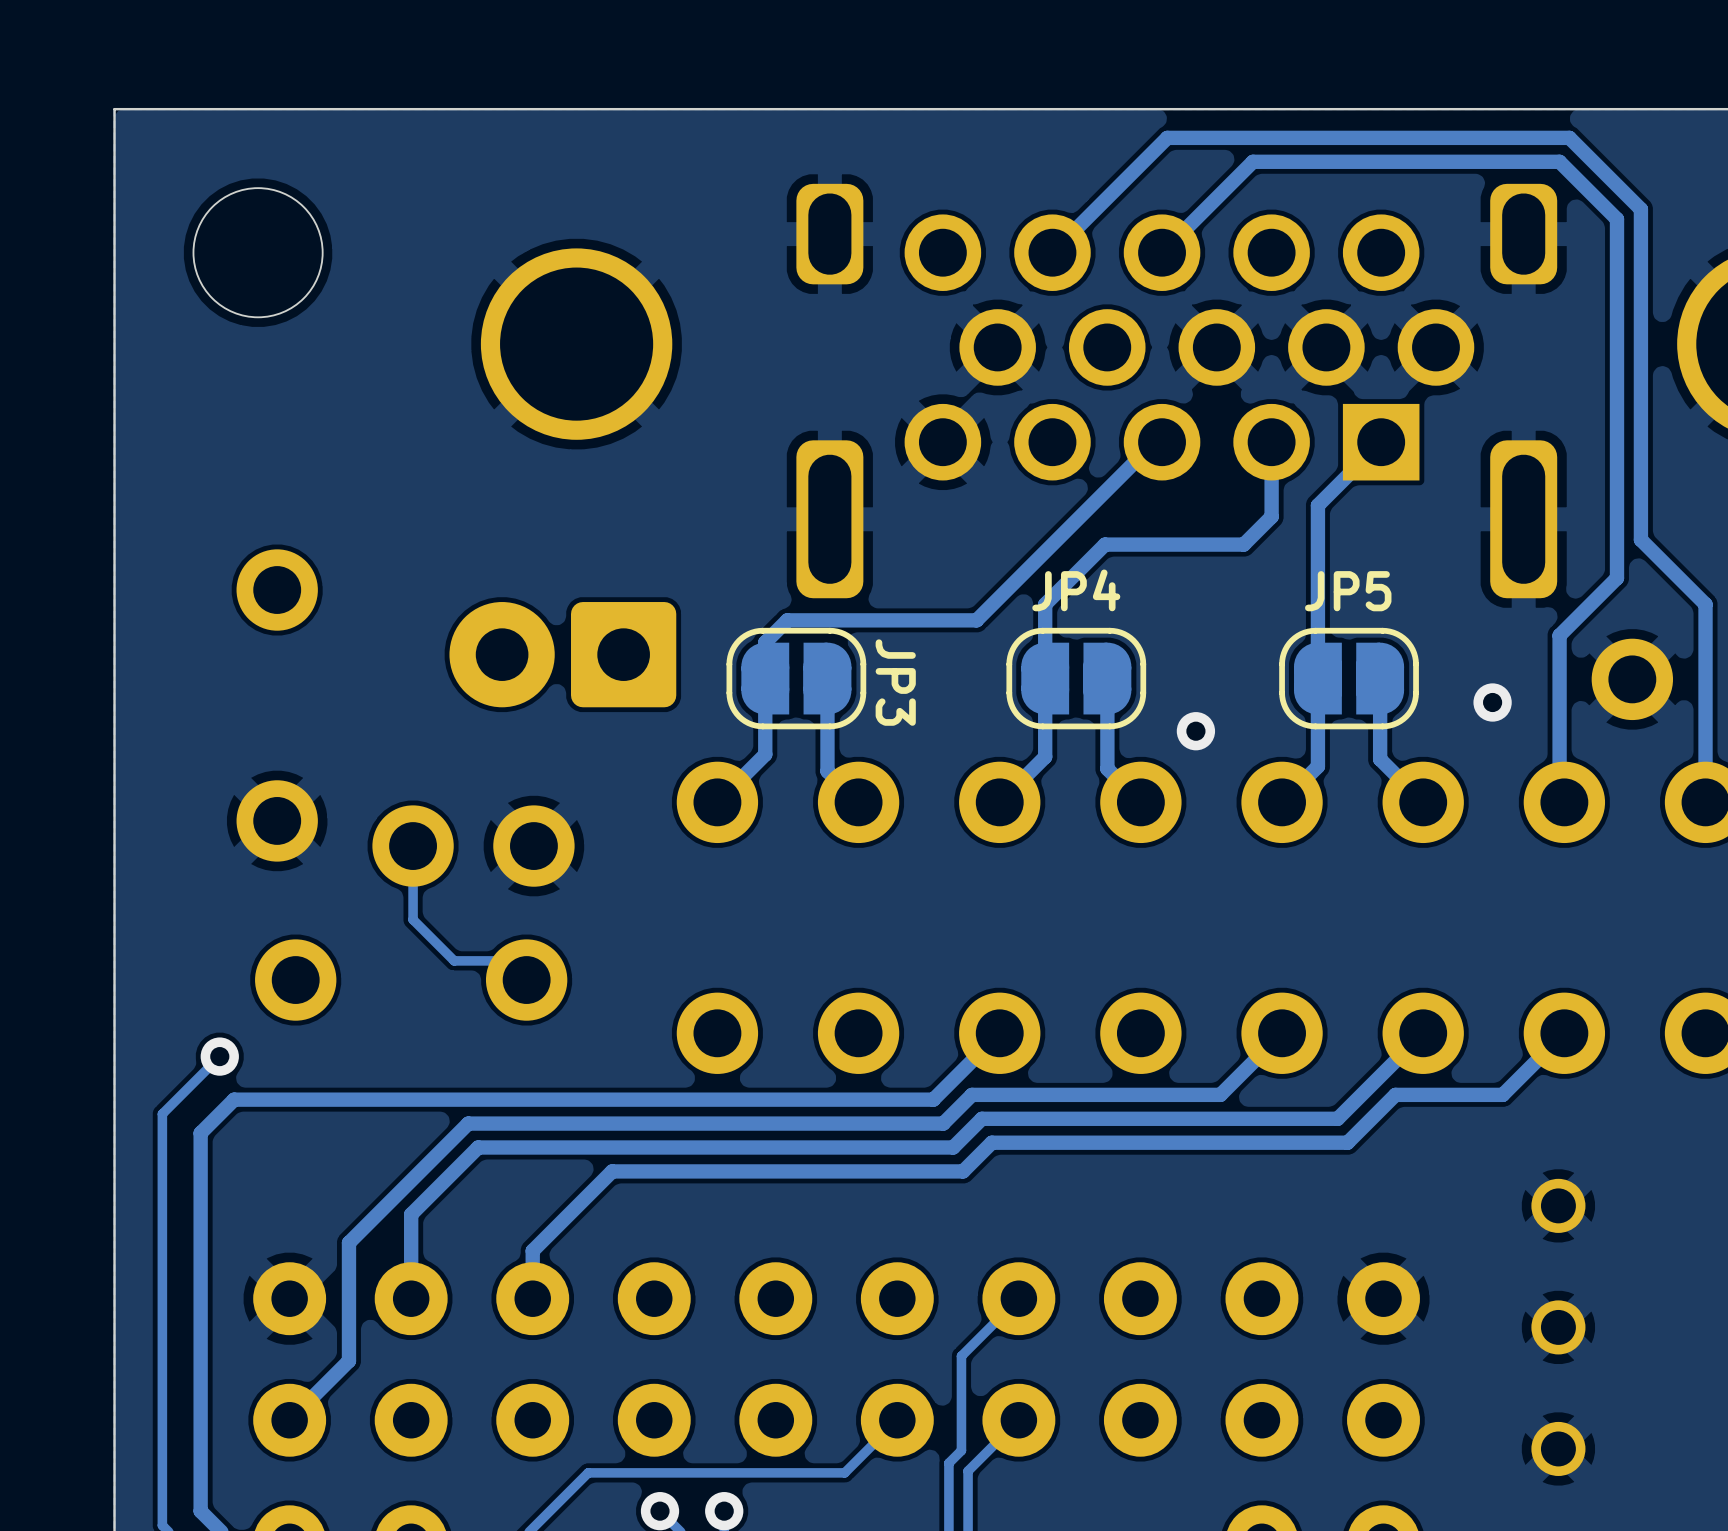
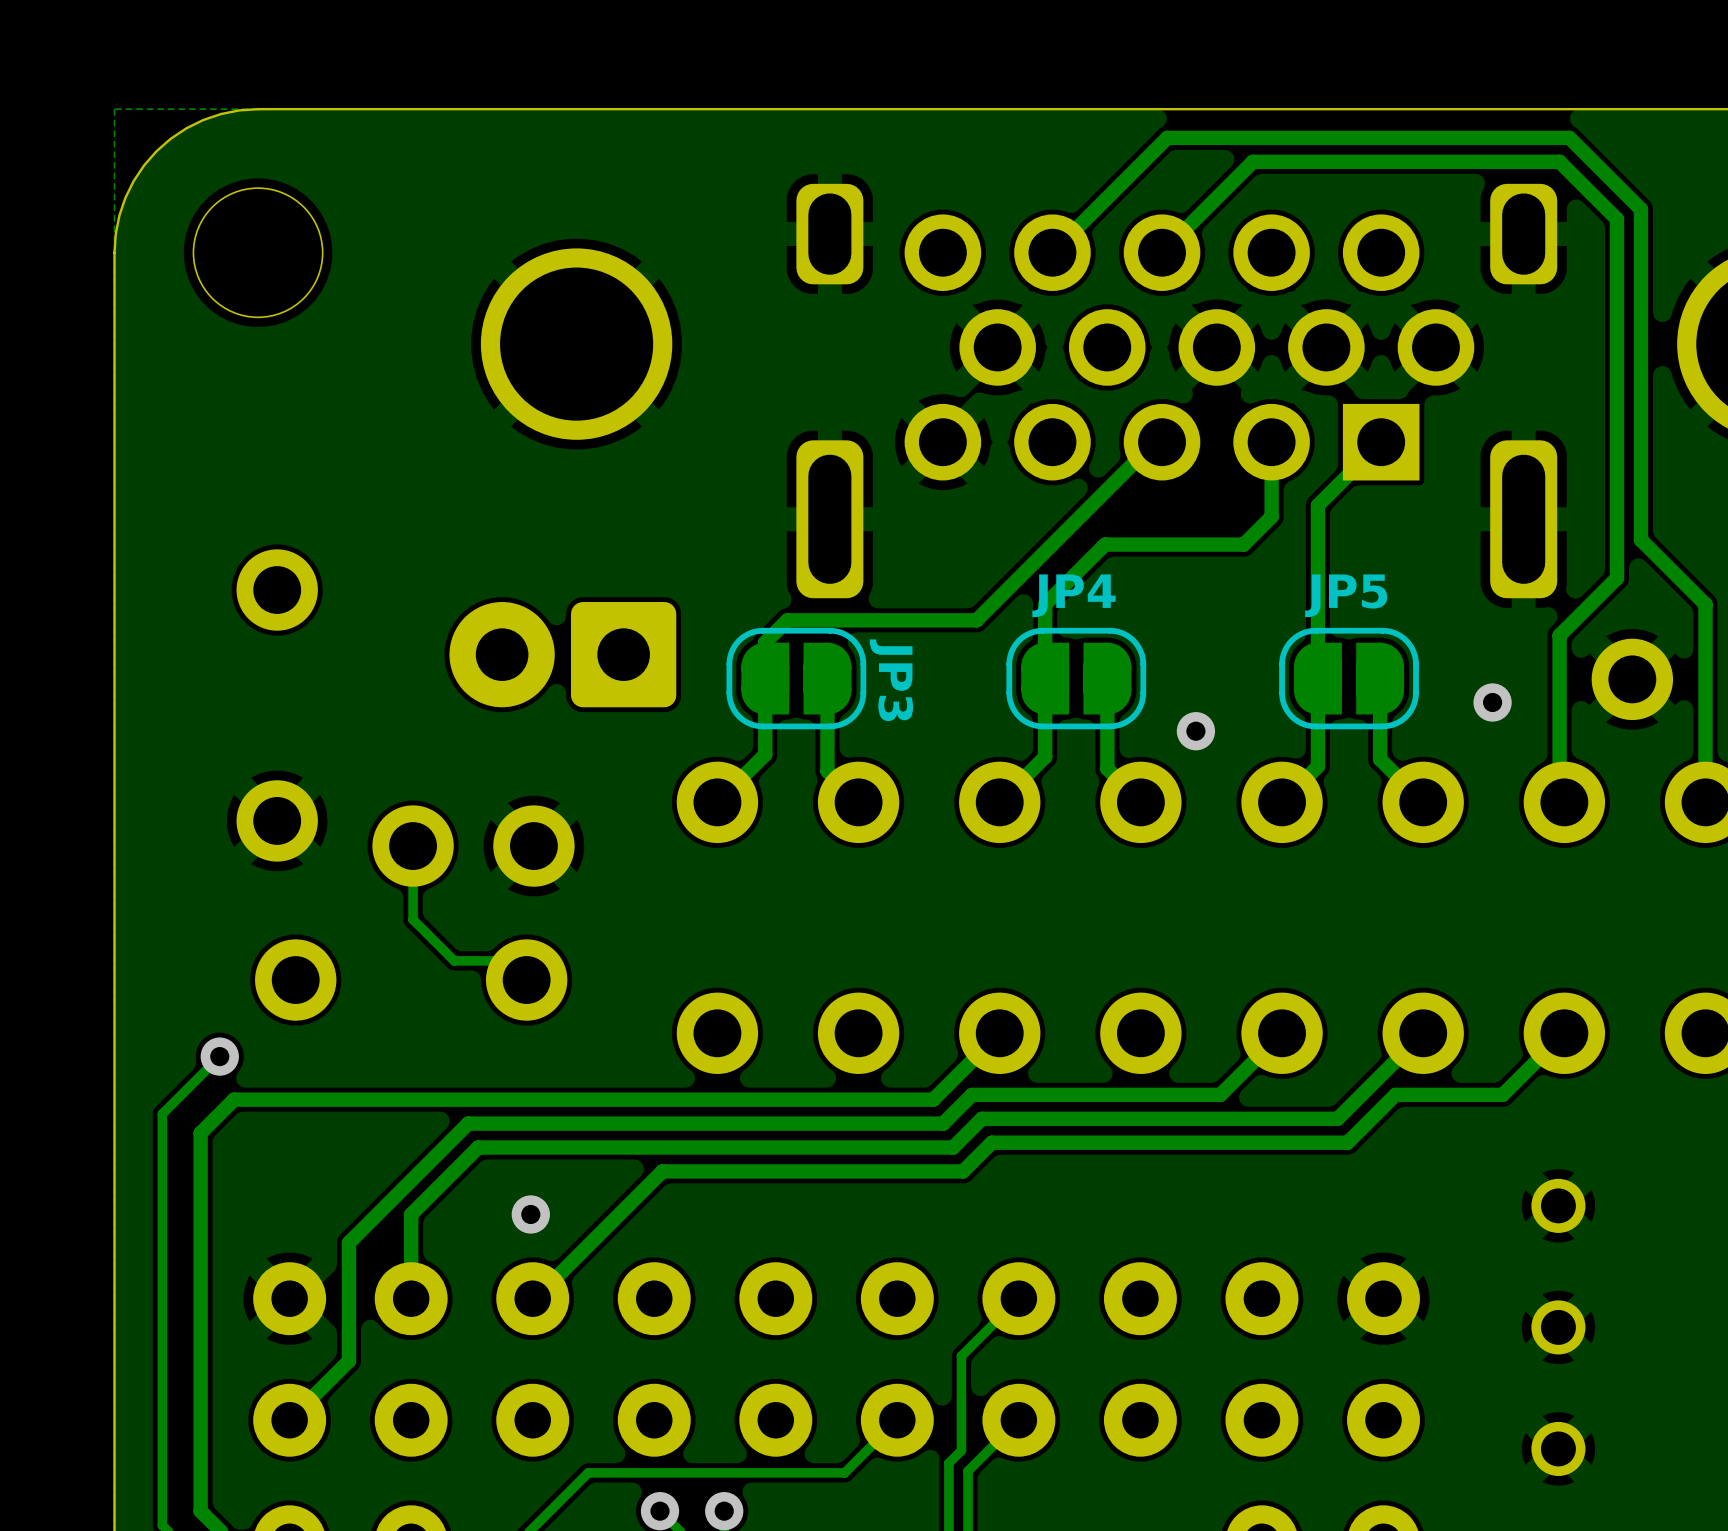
board edge: (258, 109) (114, 109) (114, 252) -> (258, 109) (239, 110) (203, 120) (186, 128) (156, 151) (133, 180) (125, 197) (119, 215) (114, 252)
track: (662, 1171) (612, 1171) (532, 1250) (532, 1298) -> (662, 1171) (535, 1298)
via: none -> (530, 1214)

